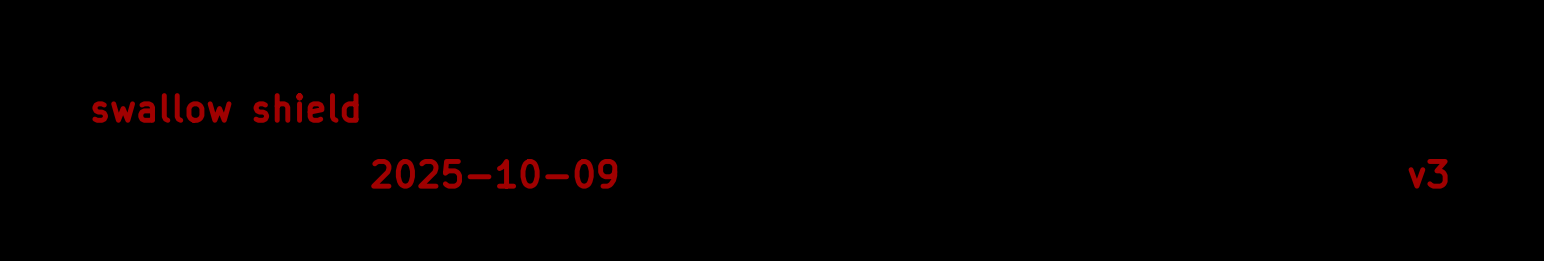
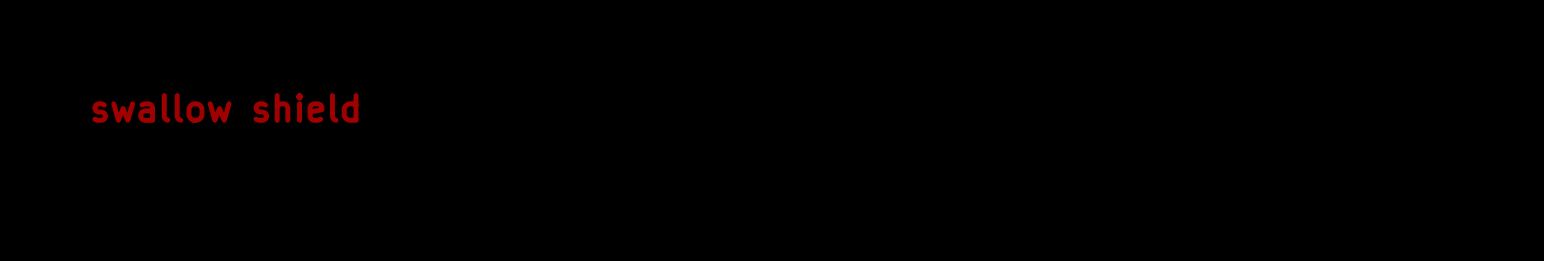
text: 2025-10-09 (494, 173) -> none
text: v3 (1428, 173) -> none

